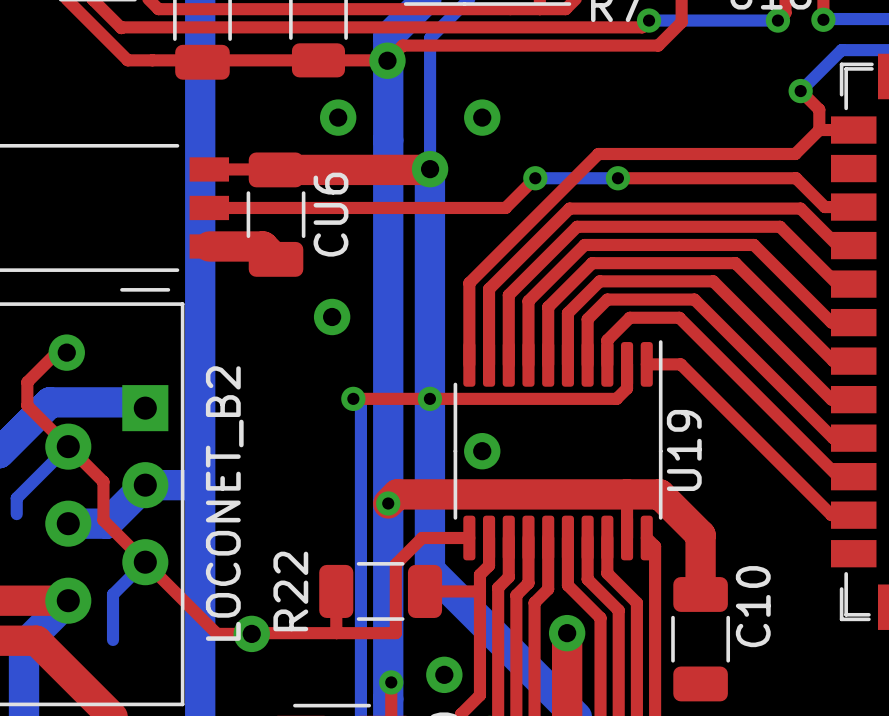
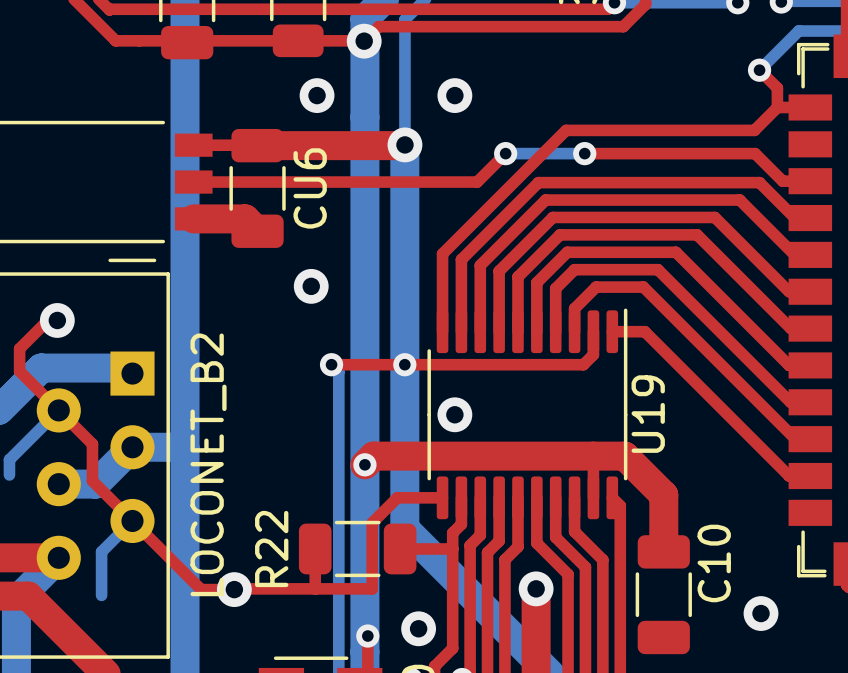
via: none -> (761, 613)

